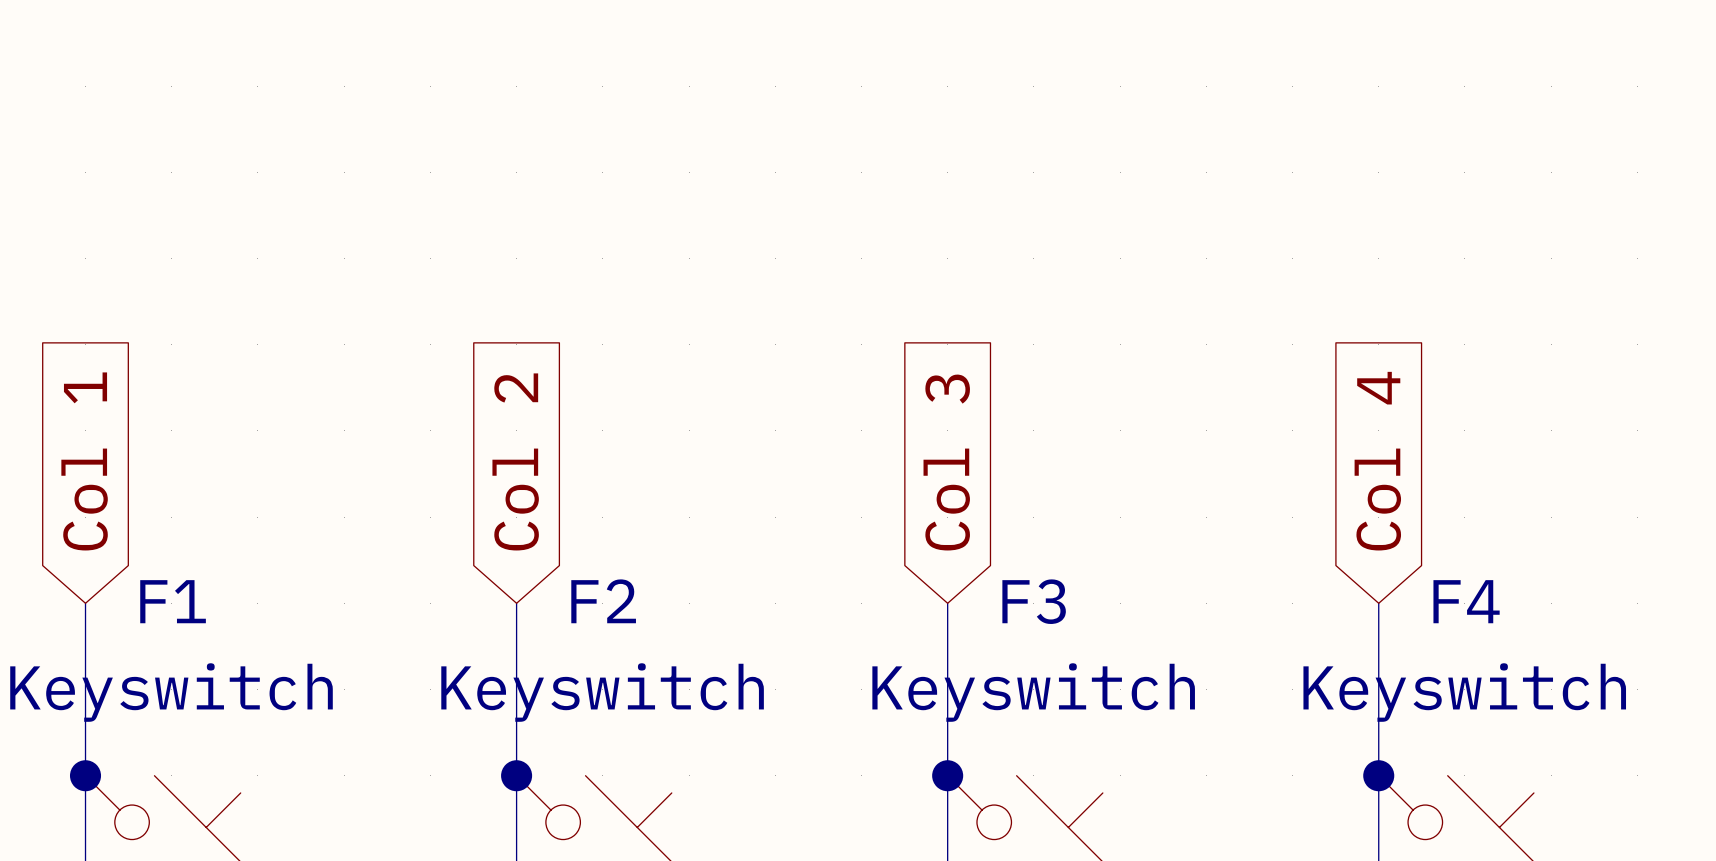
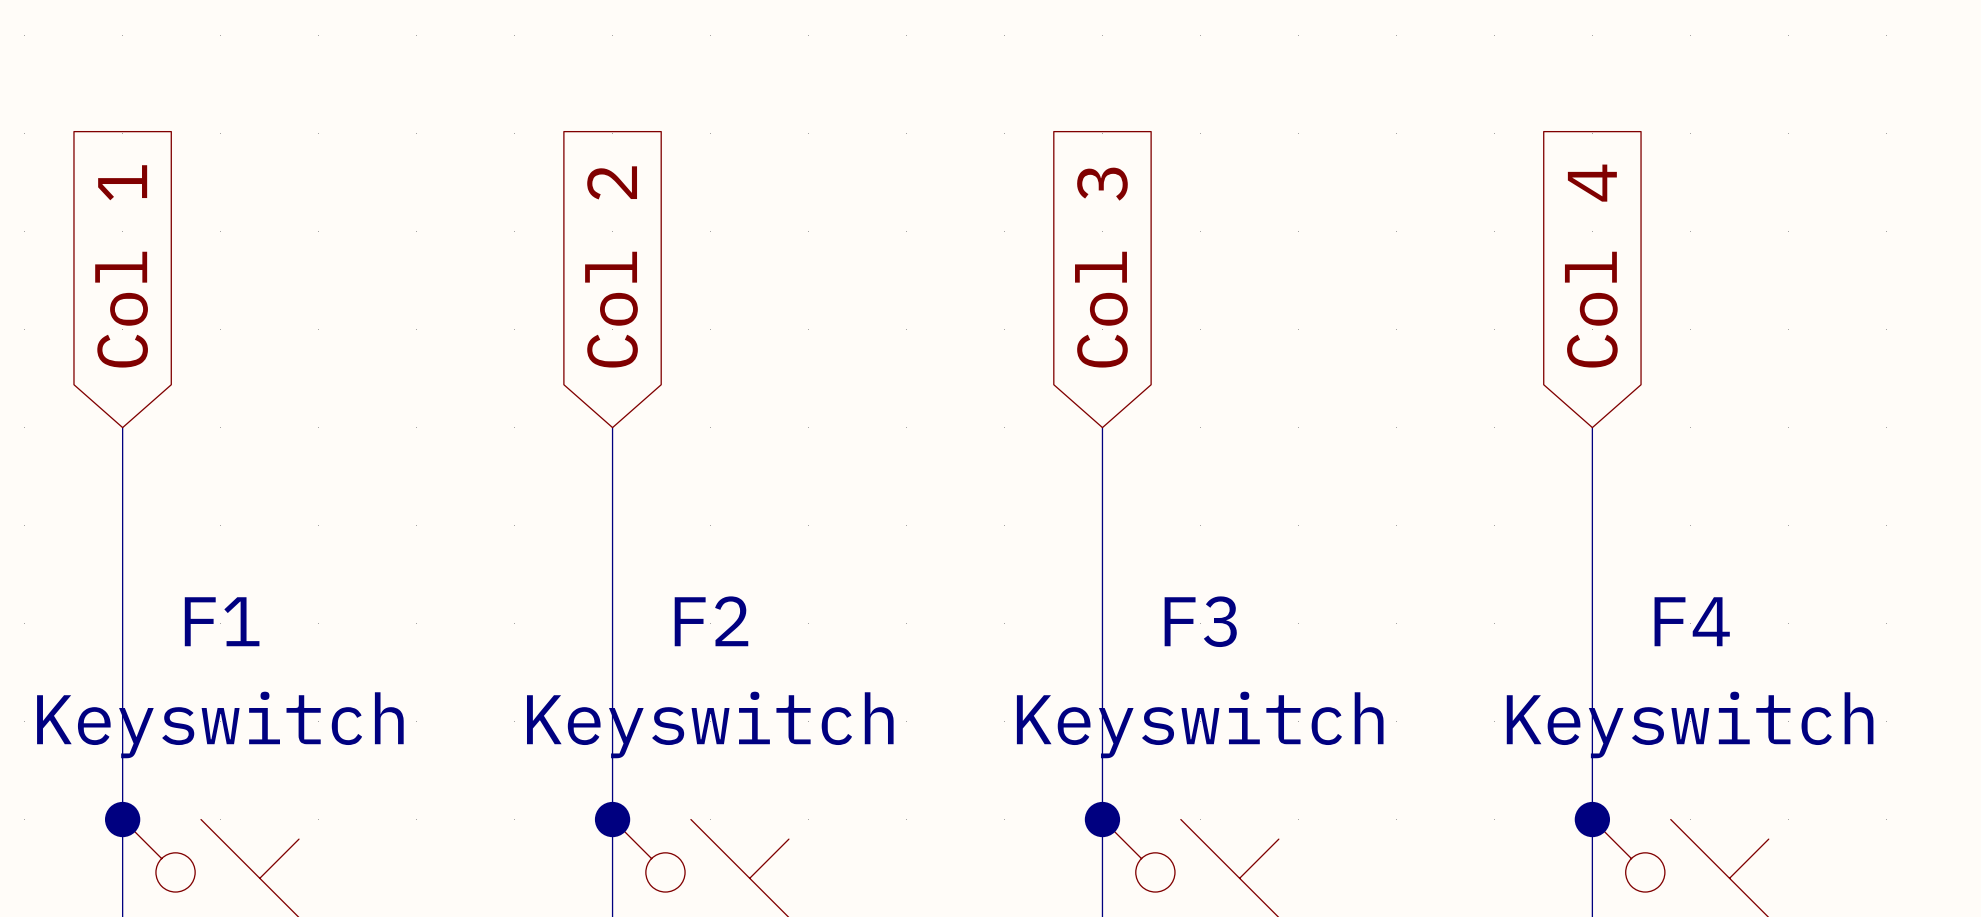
wire: none -> (122, 427) (122, 623)
wire: none -> (612, 427) (612, 623)
wire: none -> (1102, 427) (1102, 623)
wire: none -> (1592, 427) (1592, 623)
global label position: Col 1 (84, 461) -> Col 1 (121, 266)
global label position: Col 2 (515, 461) -> Col 2 (611, 266)
global label position: Col 4 (1377, 461) -> Col 4 (1591, 266)
global label position: Col 3 (946, 462) -> Col 3 (1101, 267)

